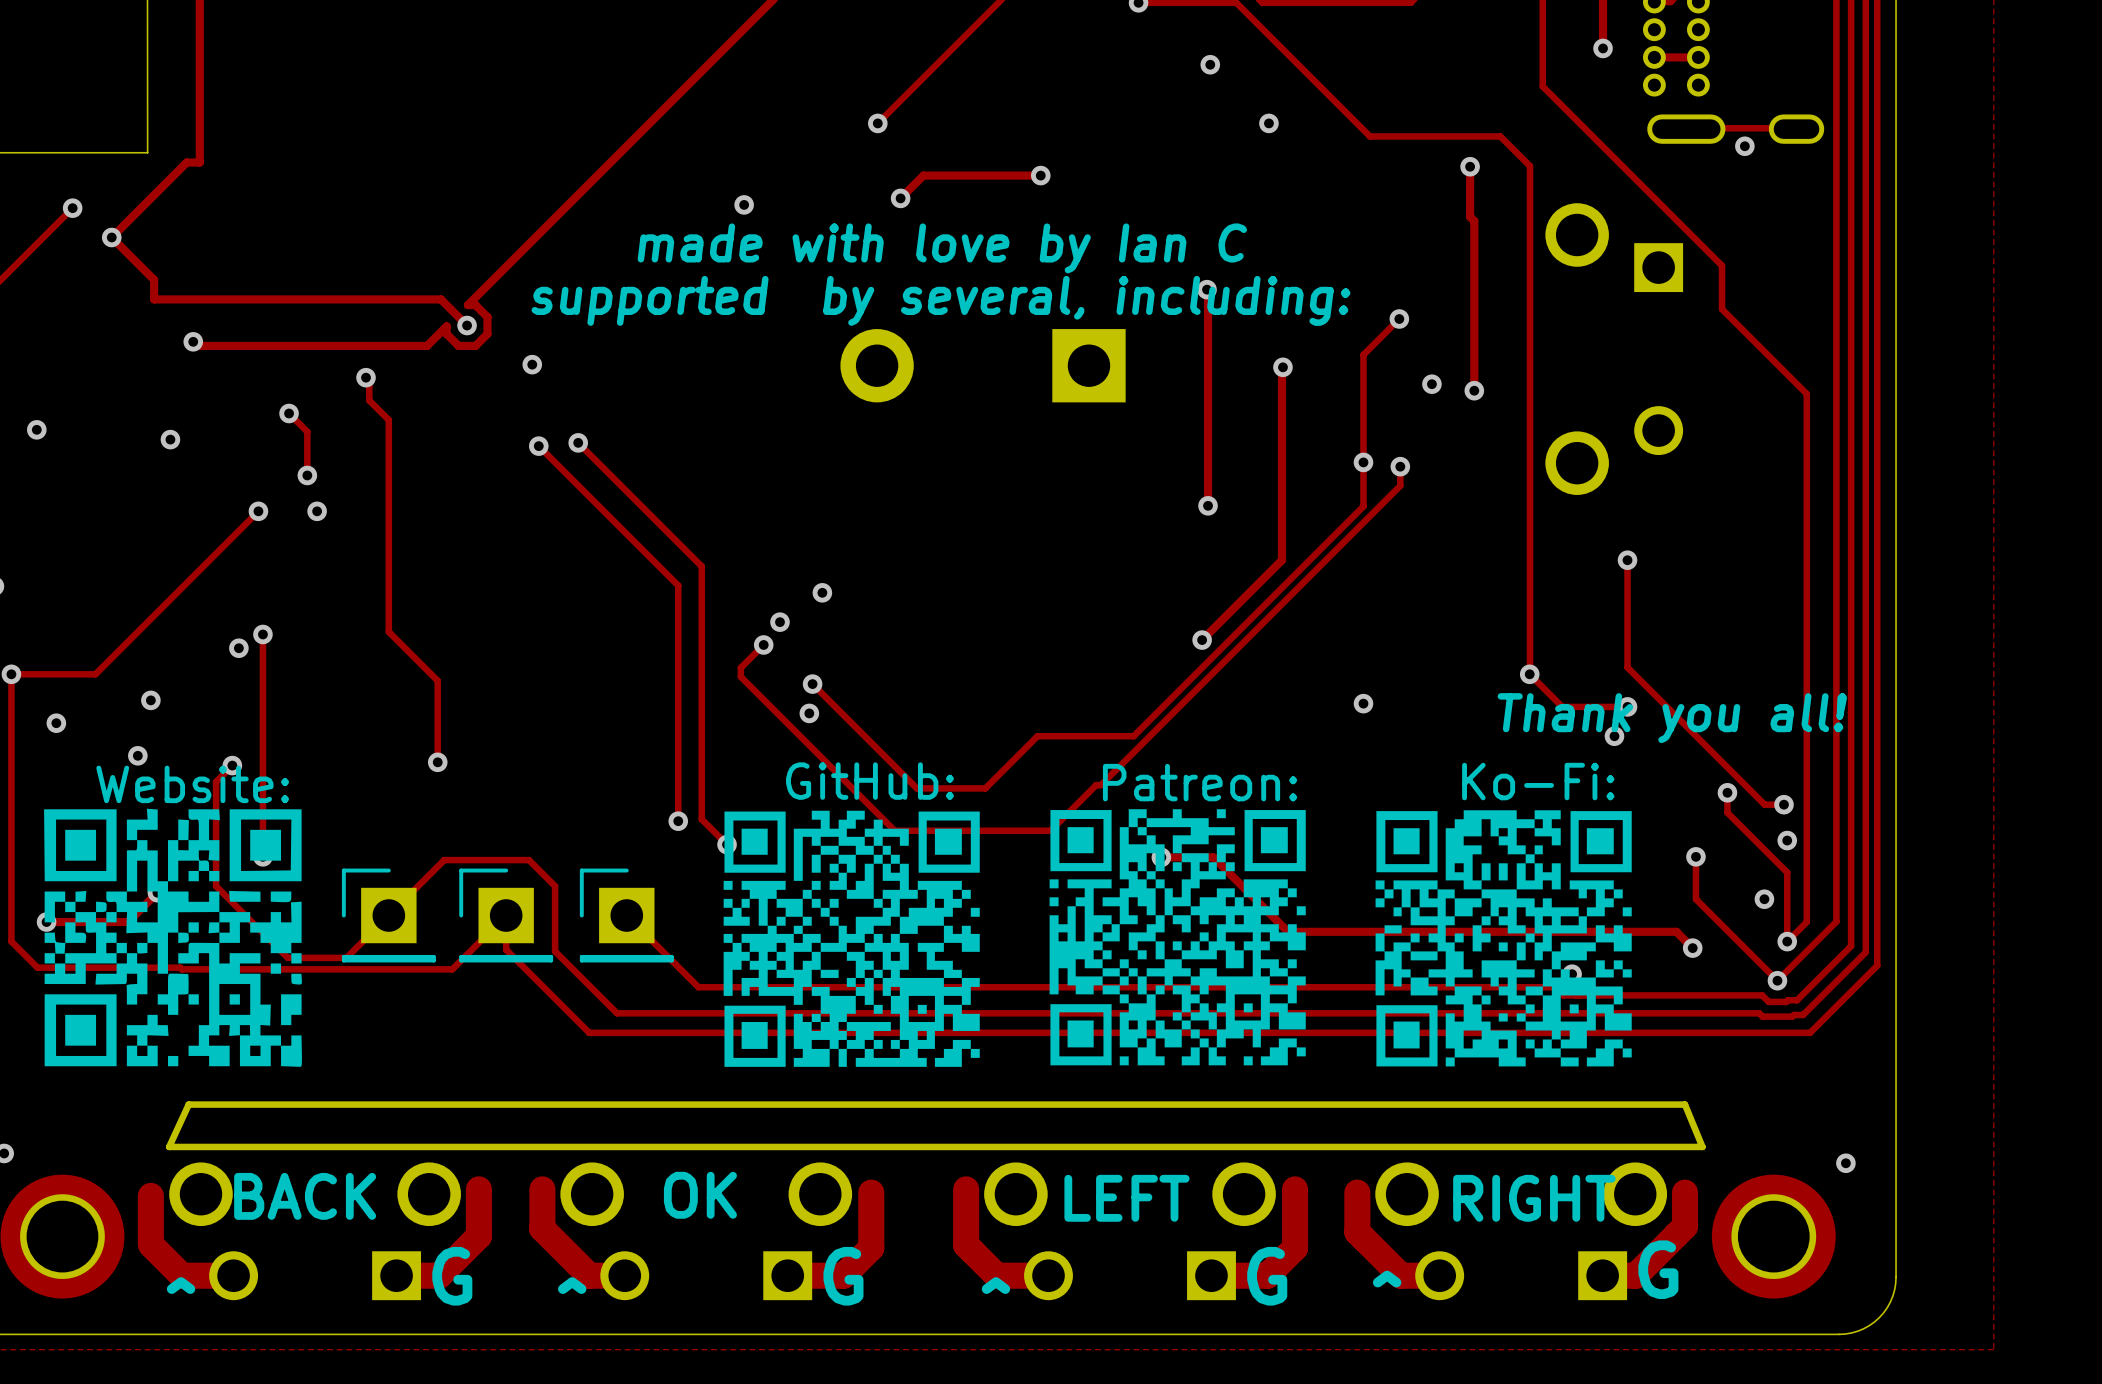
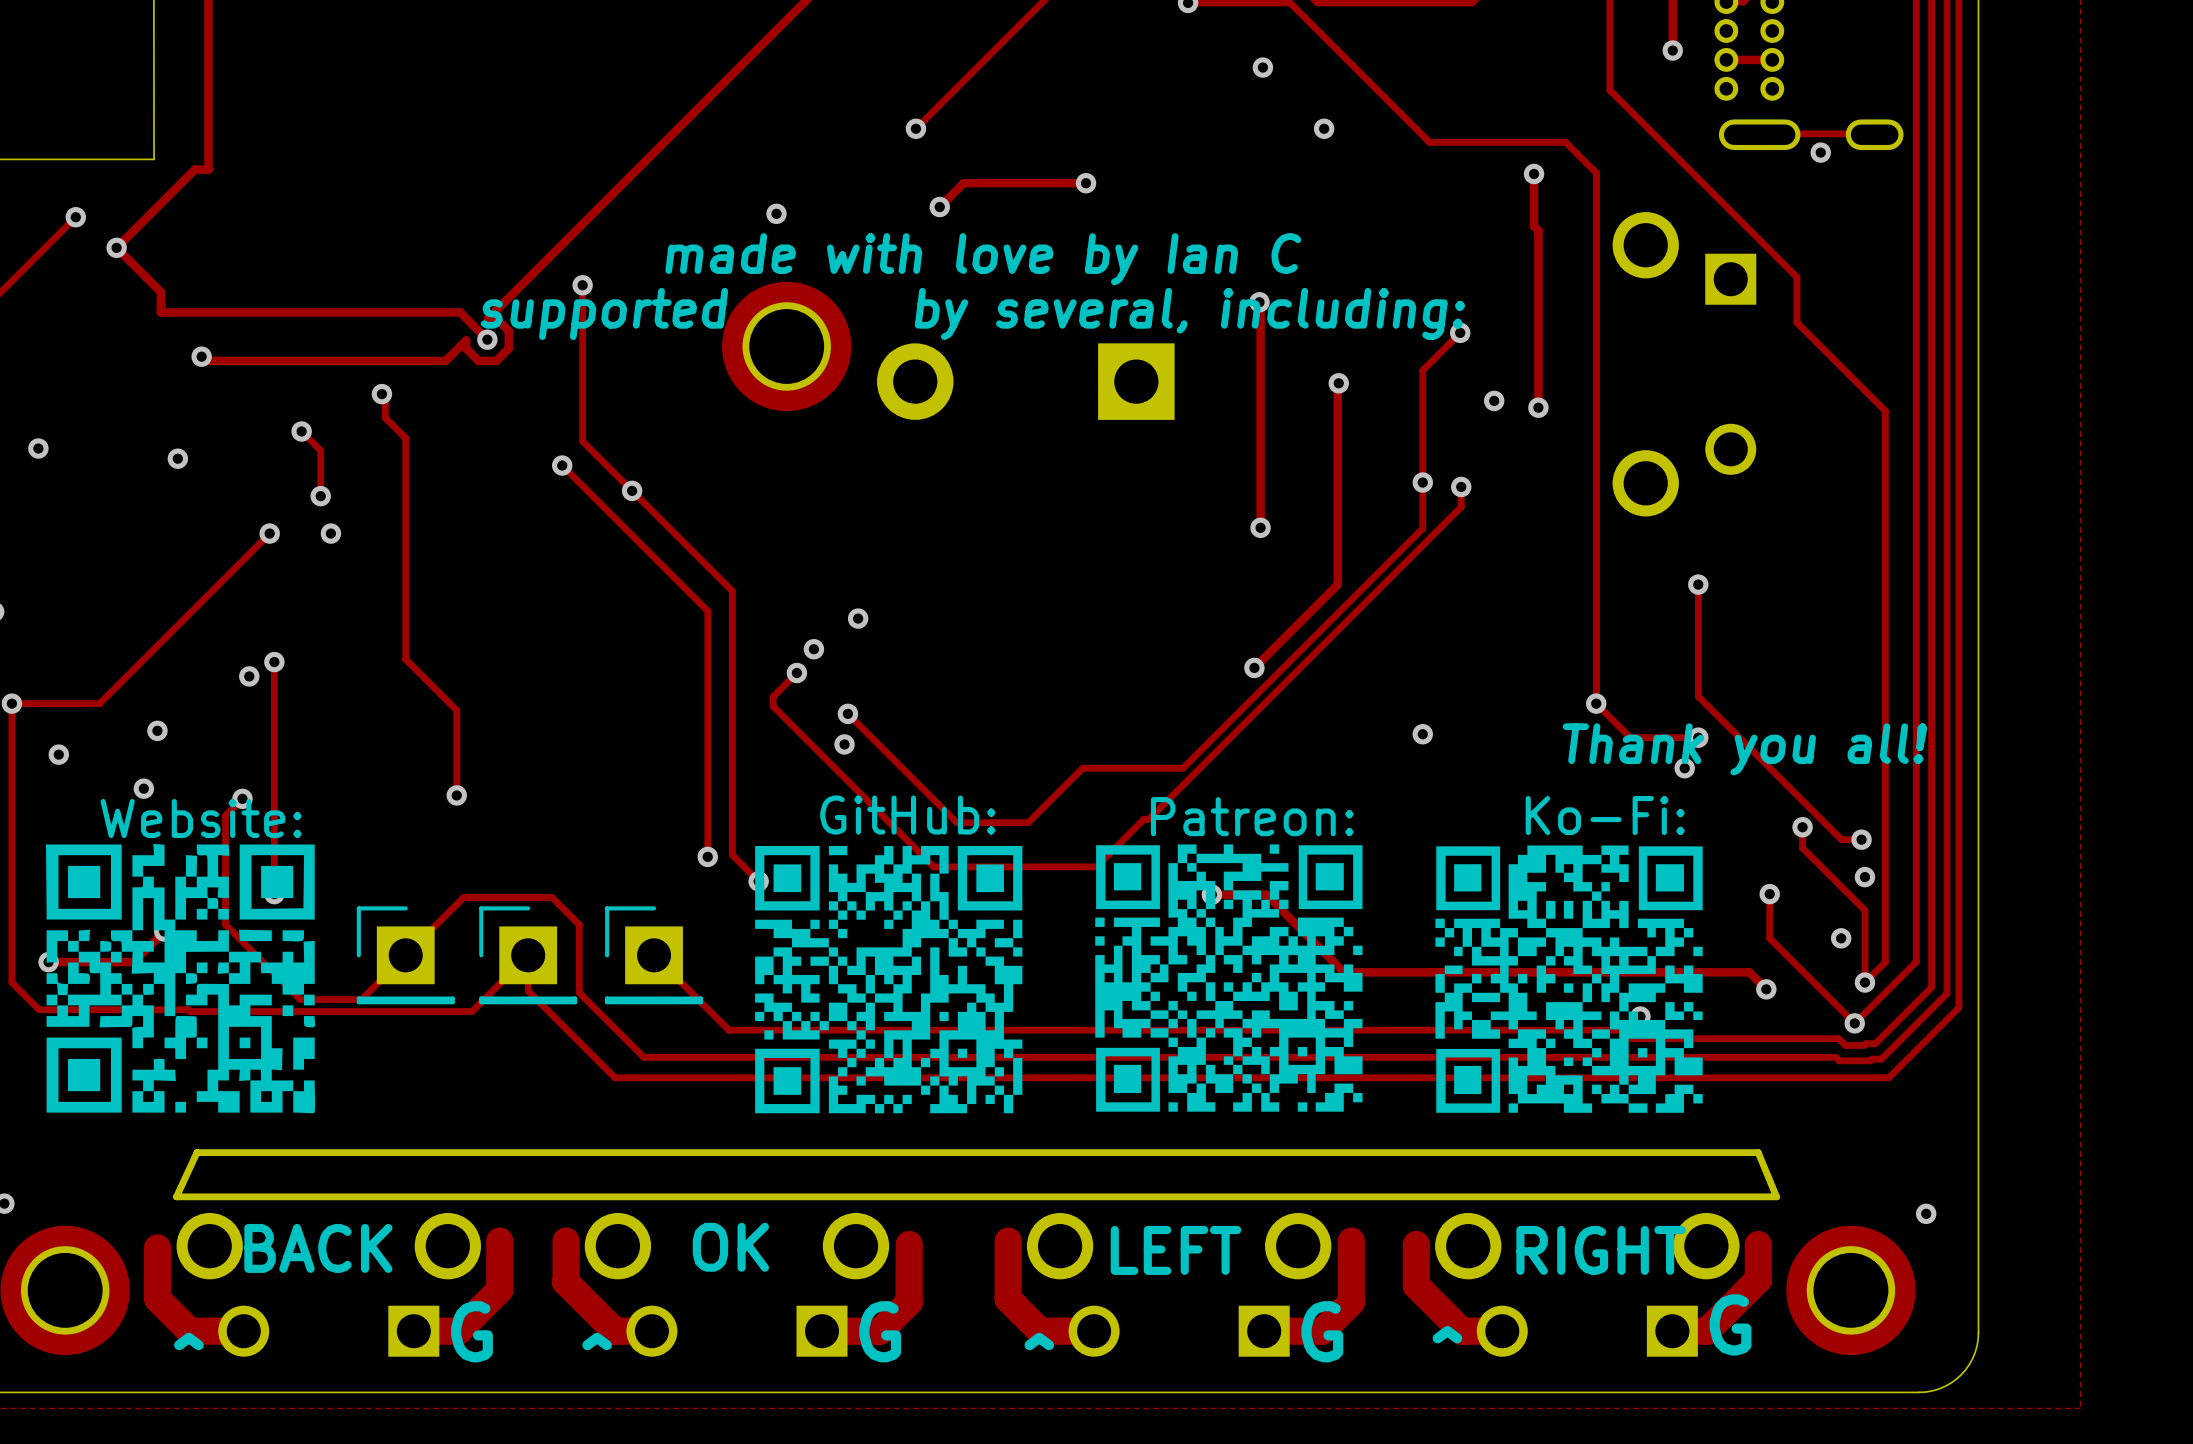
track: none -> (582, 285) (582, 441) (603, 462)
via: none -> (582, 285)
text: none -> supported (604, 313)
text: supported by several, including: (940, 300) -> by several, including: (1189, 313)
part: none -> (786, 346)
via: (532, 364) -> none
via position: (578, 442) -> (632, 490)
drawing shape: [723, 810, 980, 1067] -> [755, 845, 1023, 1114]

